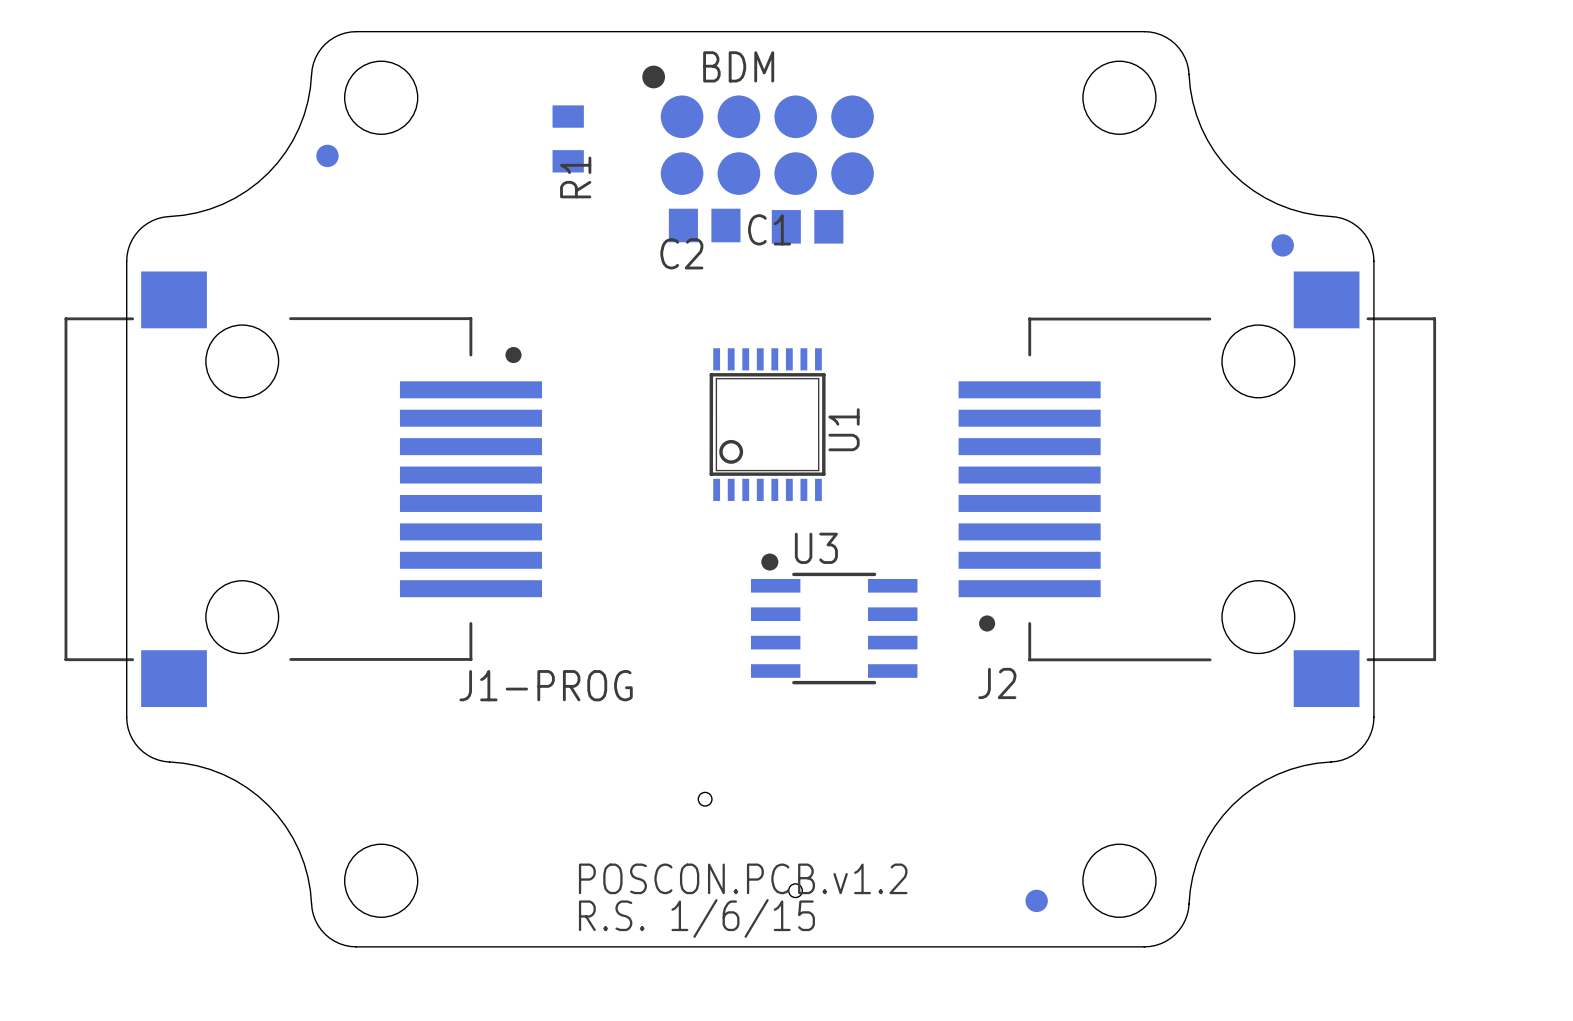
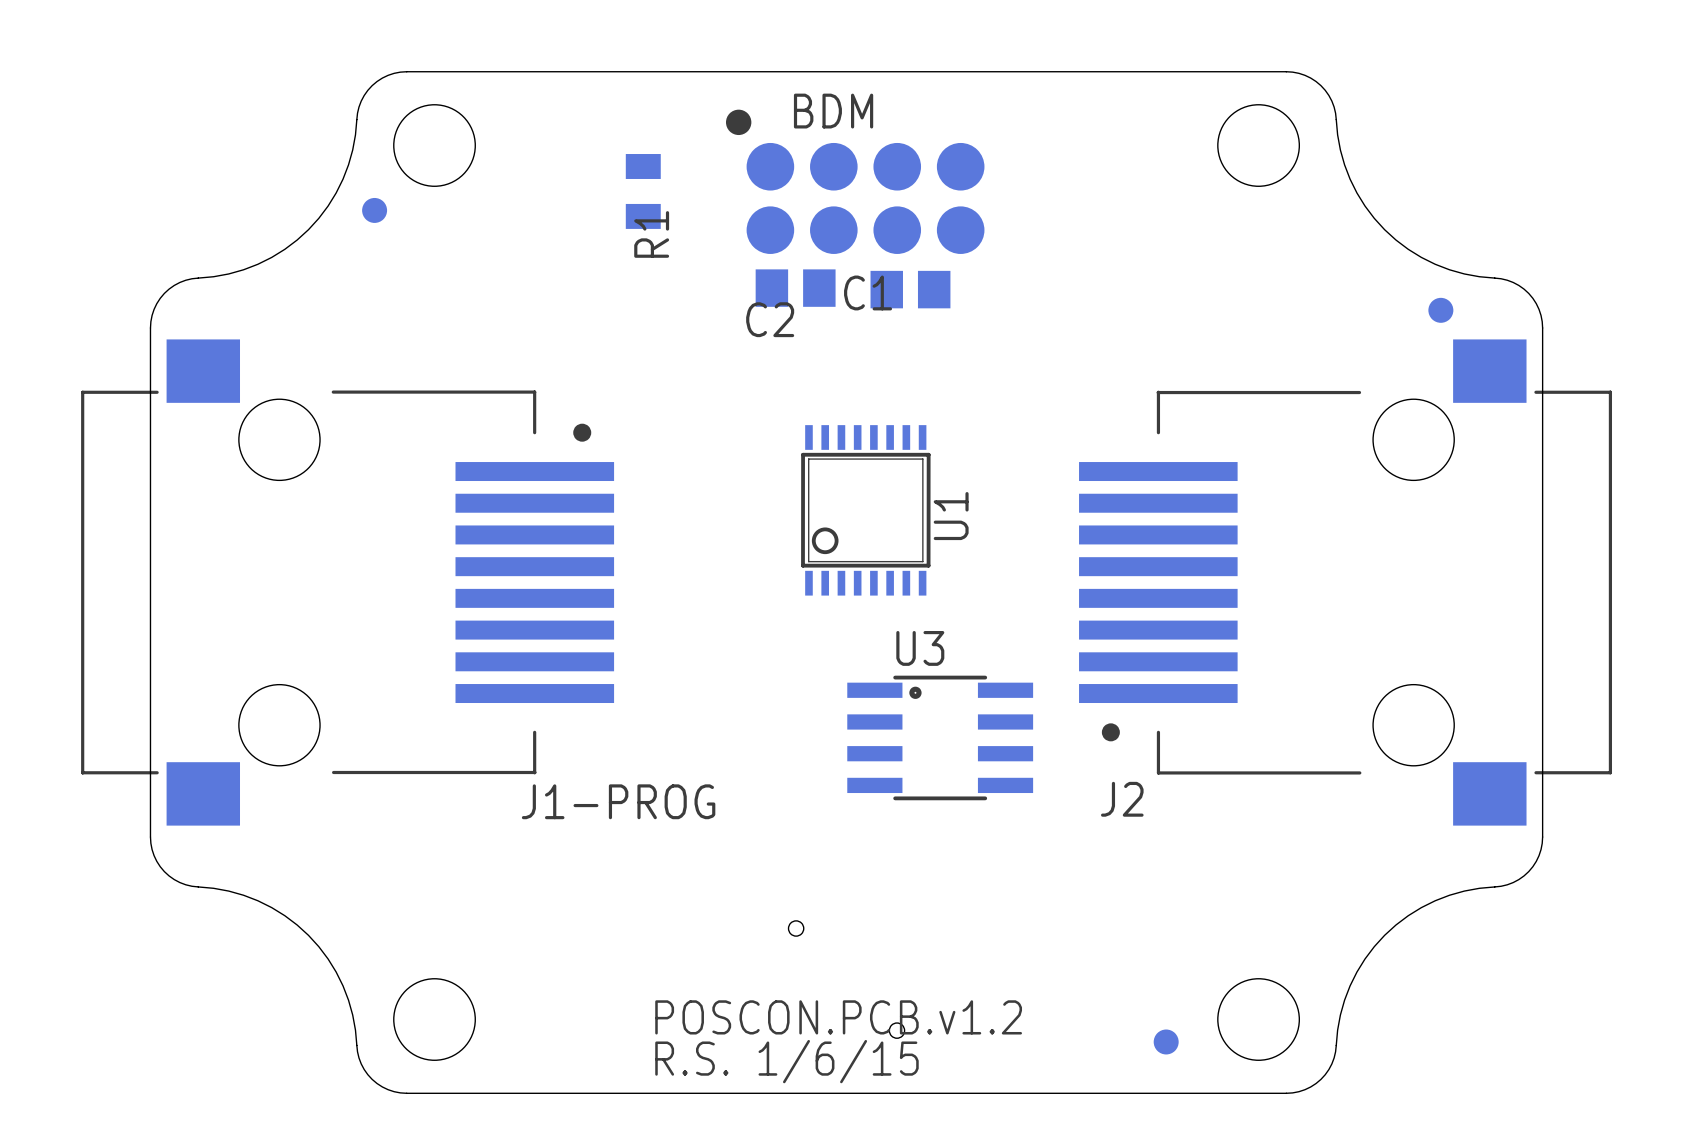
U3 footprint: [750, 553, 918, 685] -> [847, 675, 1034, 801]

